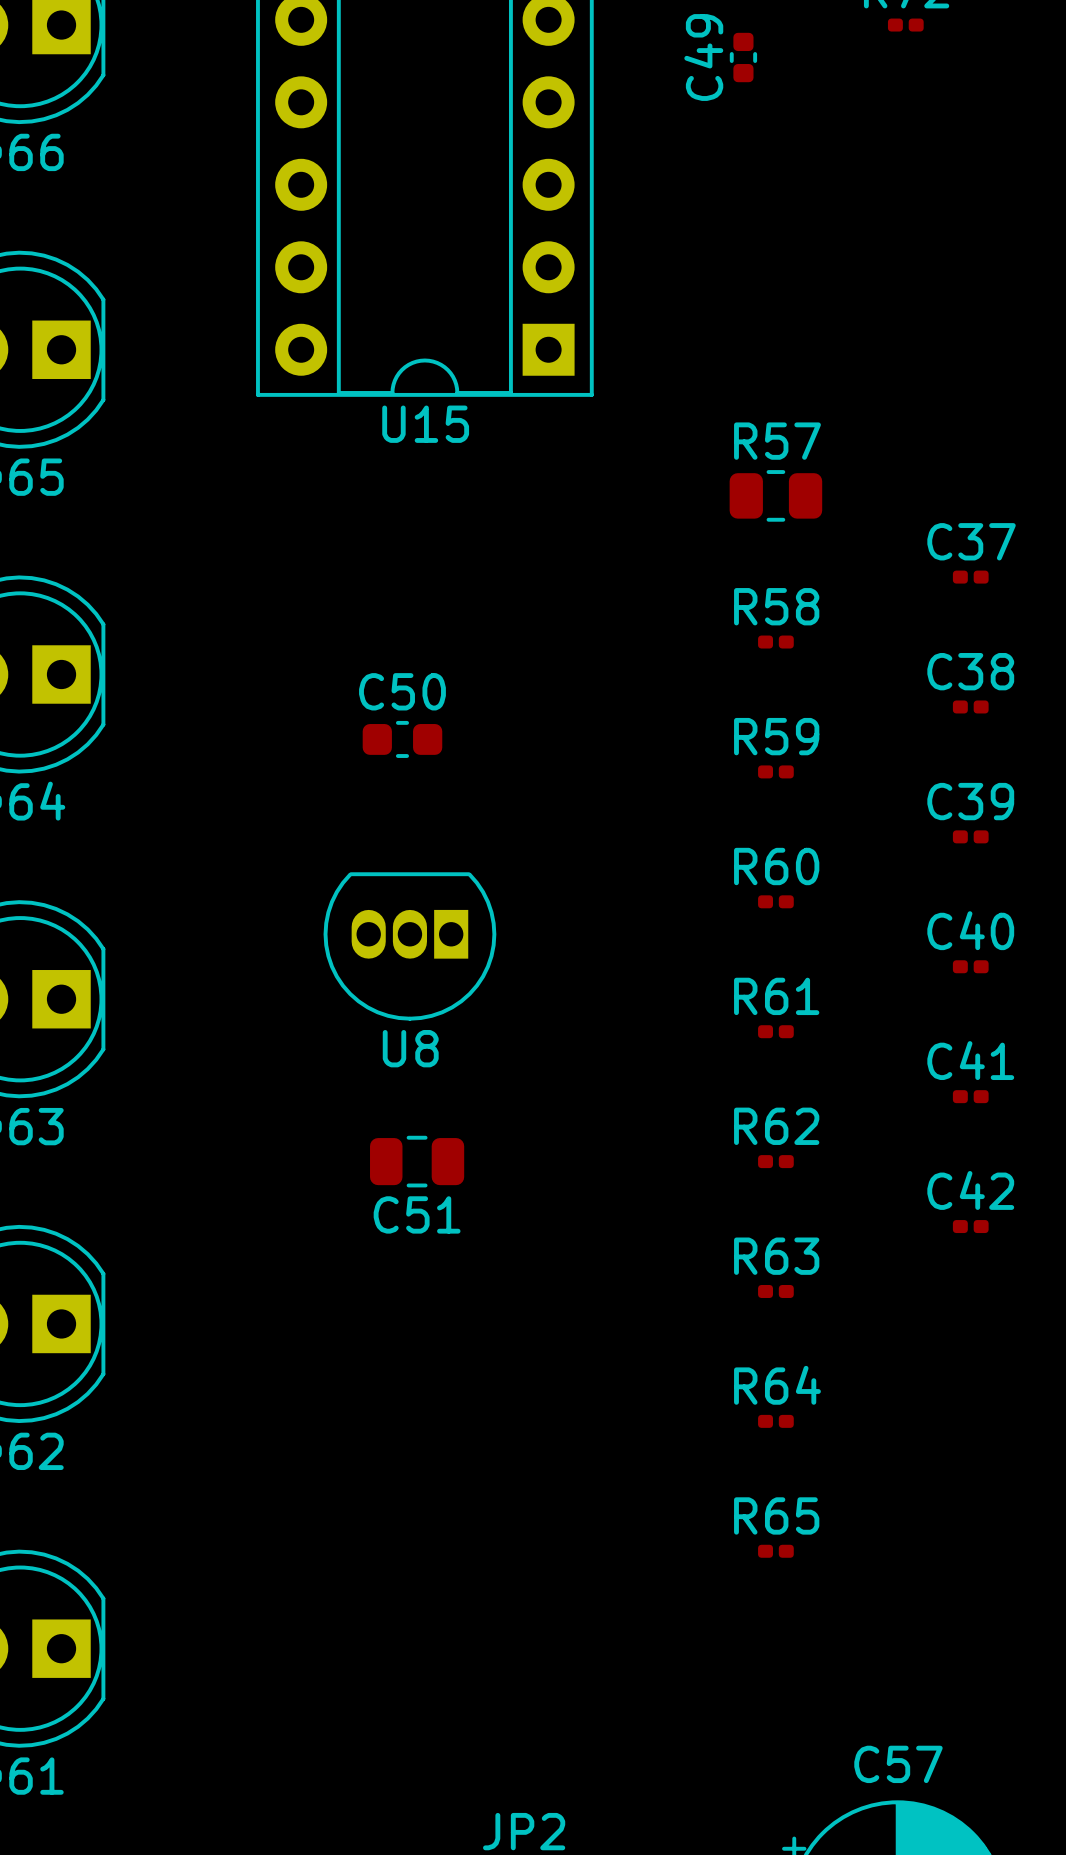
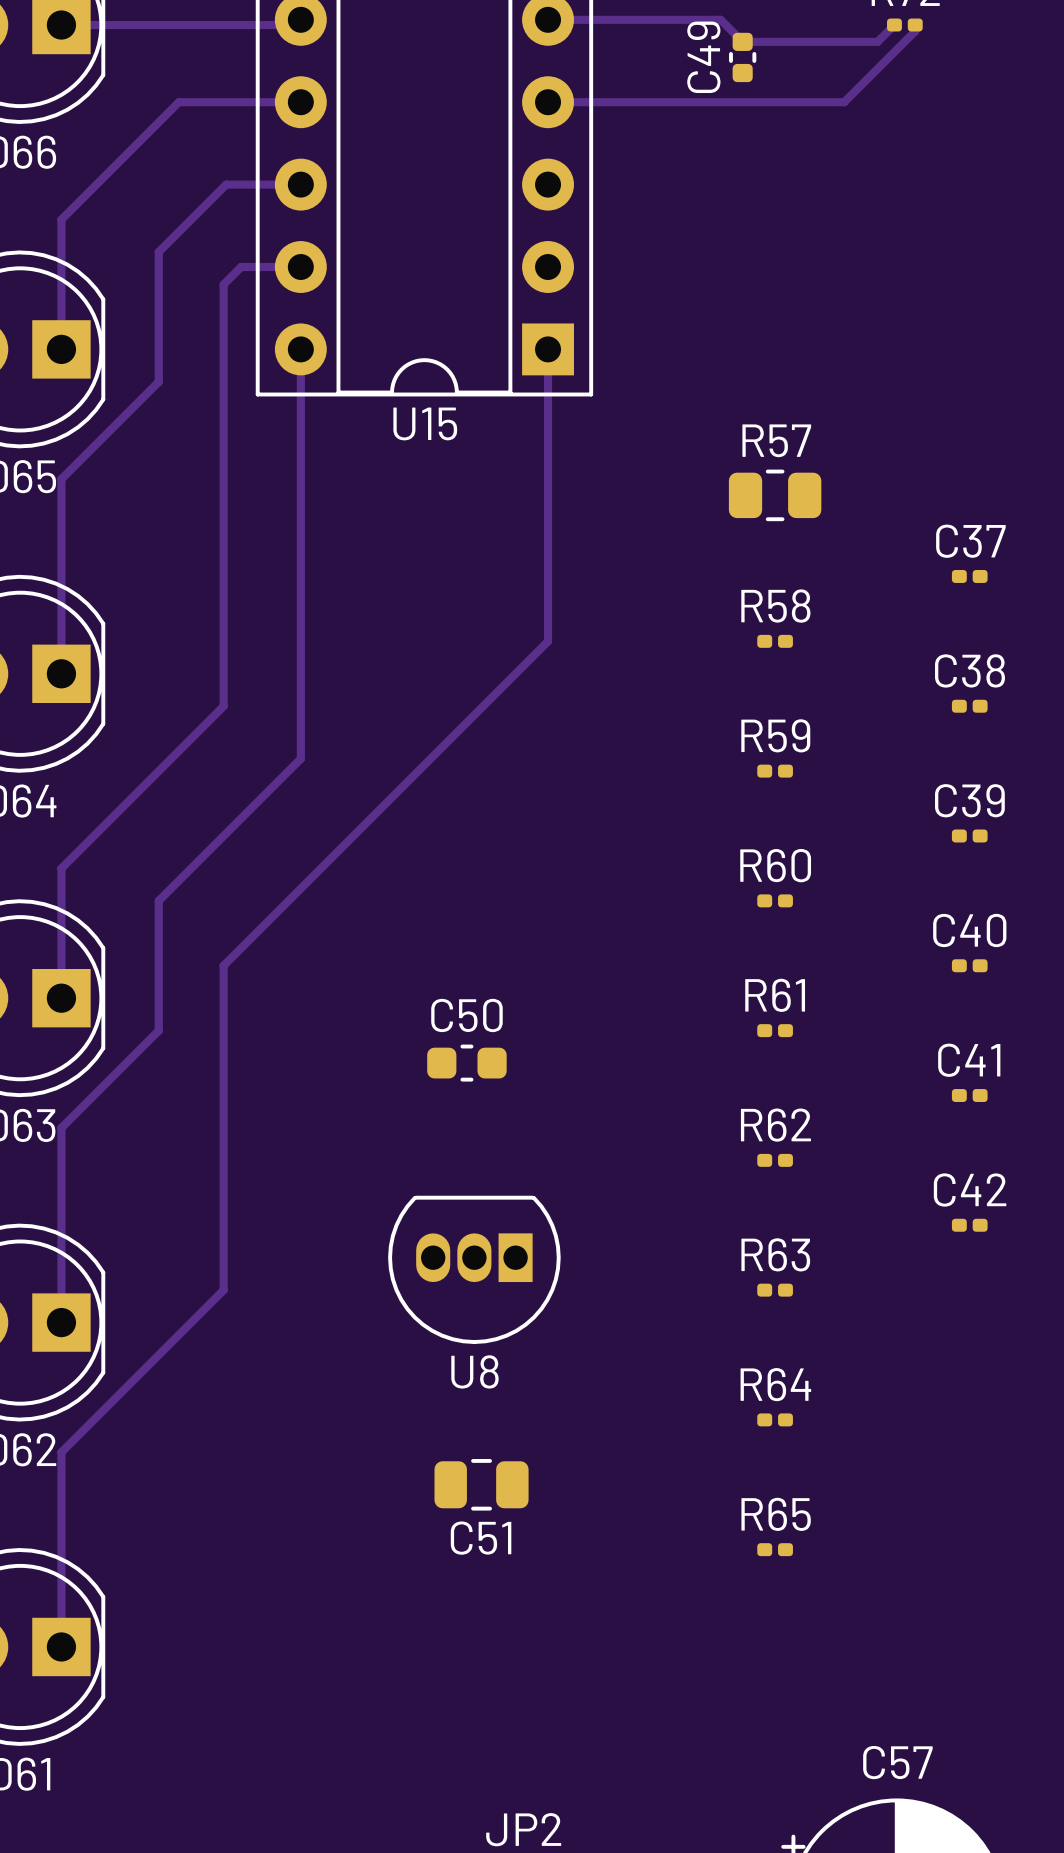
track: none -> (300, 19) (295, 25) (61, 25)
track: none -> (548, 19) (720, 19) (742, 41) (877, 41) (894, 25)
track: none -> (915, 25) (915, 31) (844, 102) (548, 102)
track: none -> (300, 102) (178, 102) (61, 219) (61, 349)
track: none -> (300, 184) (226, 184) (158, 252) (158, 381) (61, 479) (61, 673)
track: none -> (300, 267) (241, 267) (223, 284) (223, 706) (61, 868) (61, 998)
track: none -> (300, 349) (300, 758) (158, 900) (158, 1030) (61, 1127) (61, 1322)
track: none -> (548, 349) (548, 641) (223, 965) (223, 1290) (61, 1452) (61, 1646)
C50 position: (402, 739) -> (466, 1063)
U8 position: (409, 946) -> (474, 1269)
C51 position: (417, 1161) -> (481, 1484)

